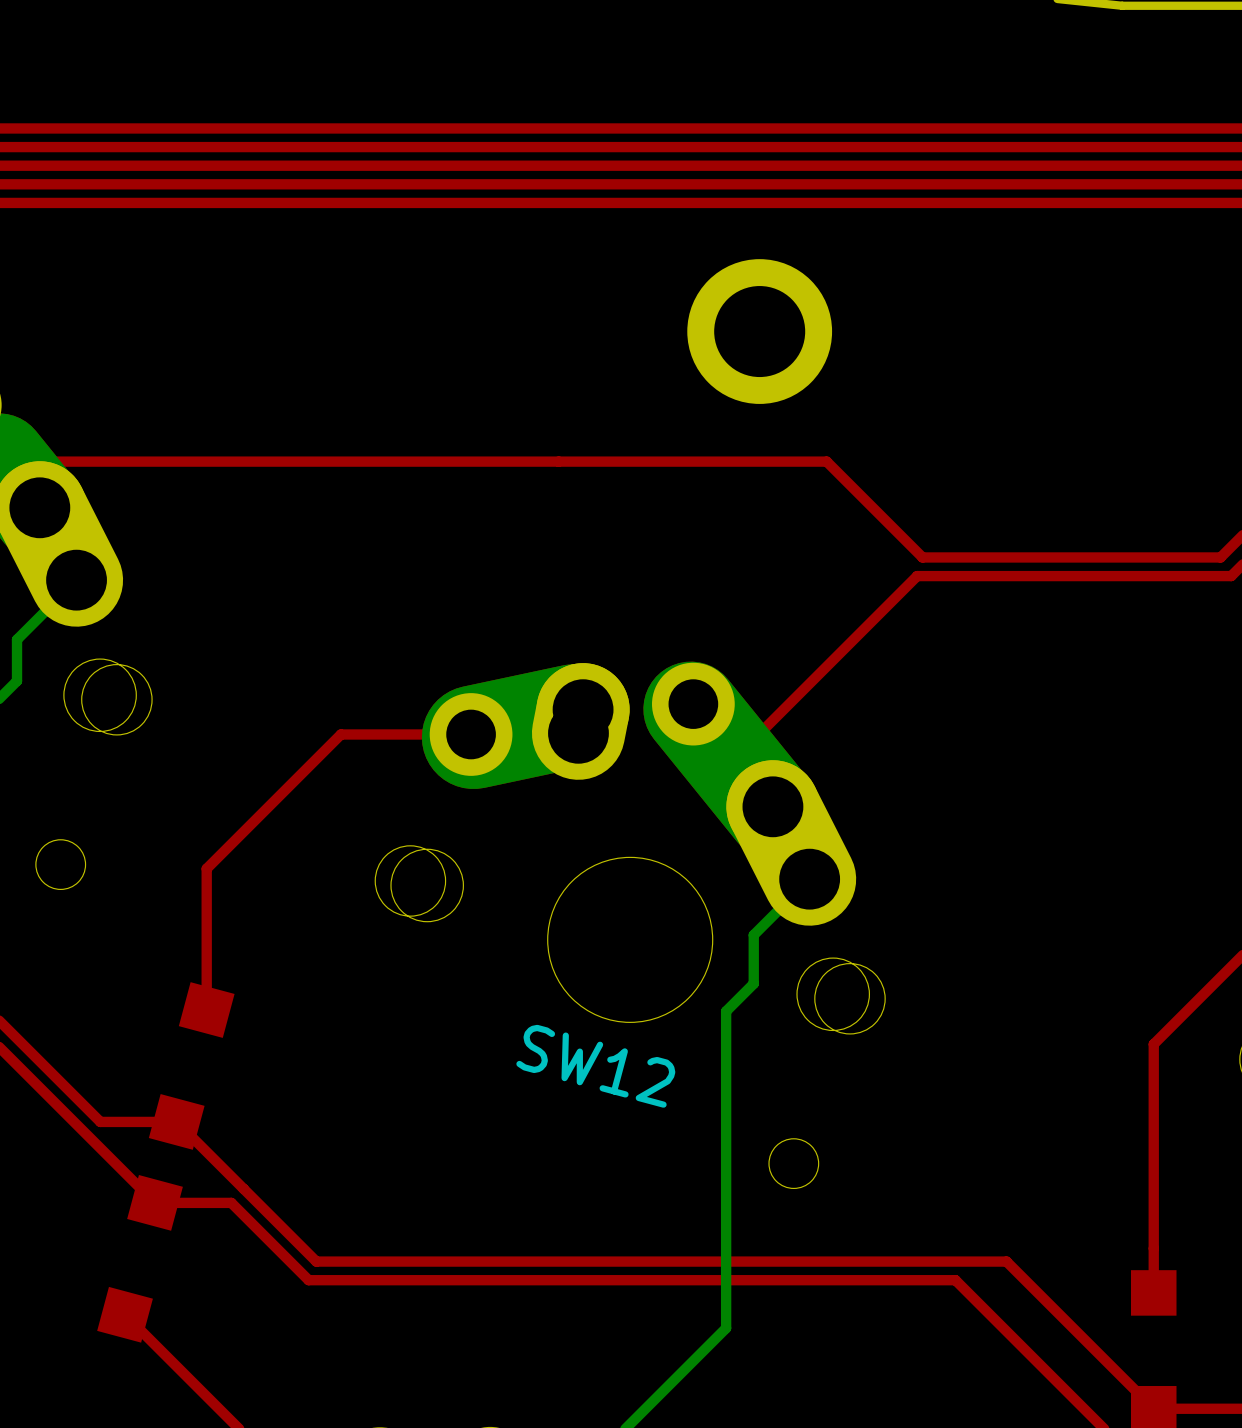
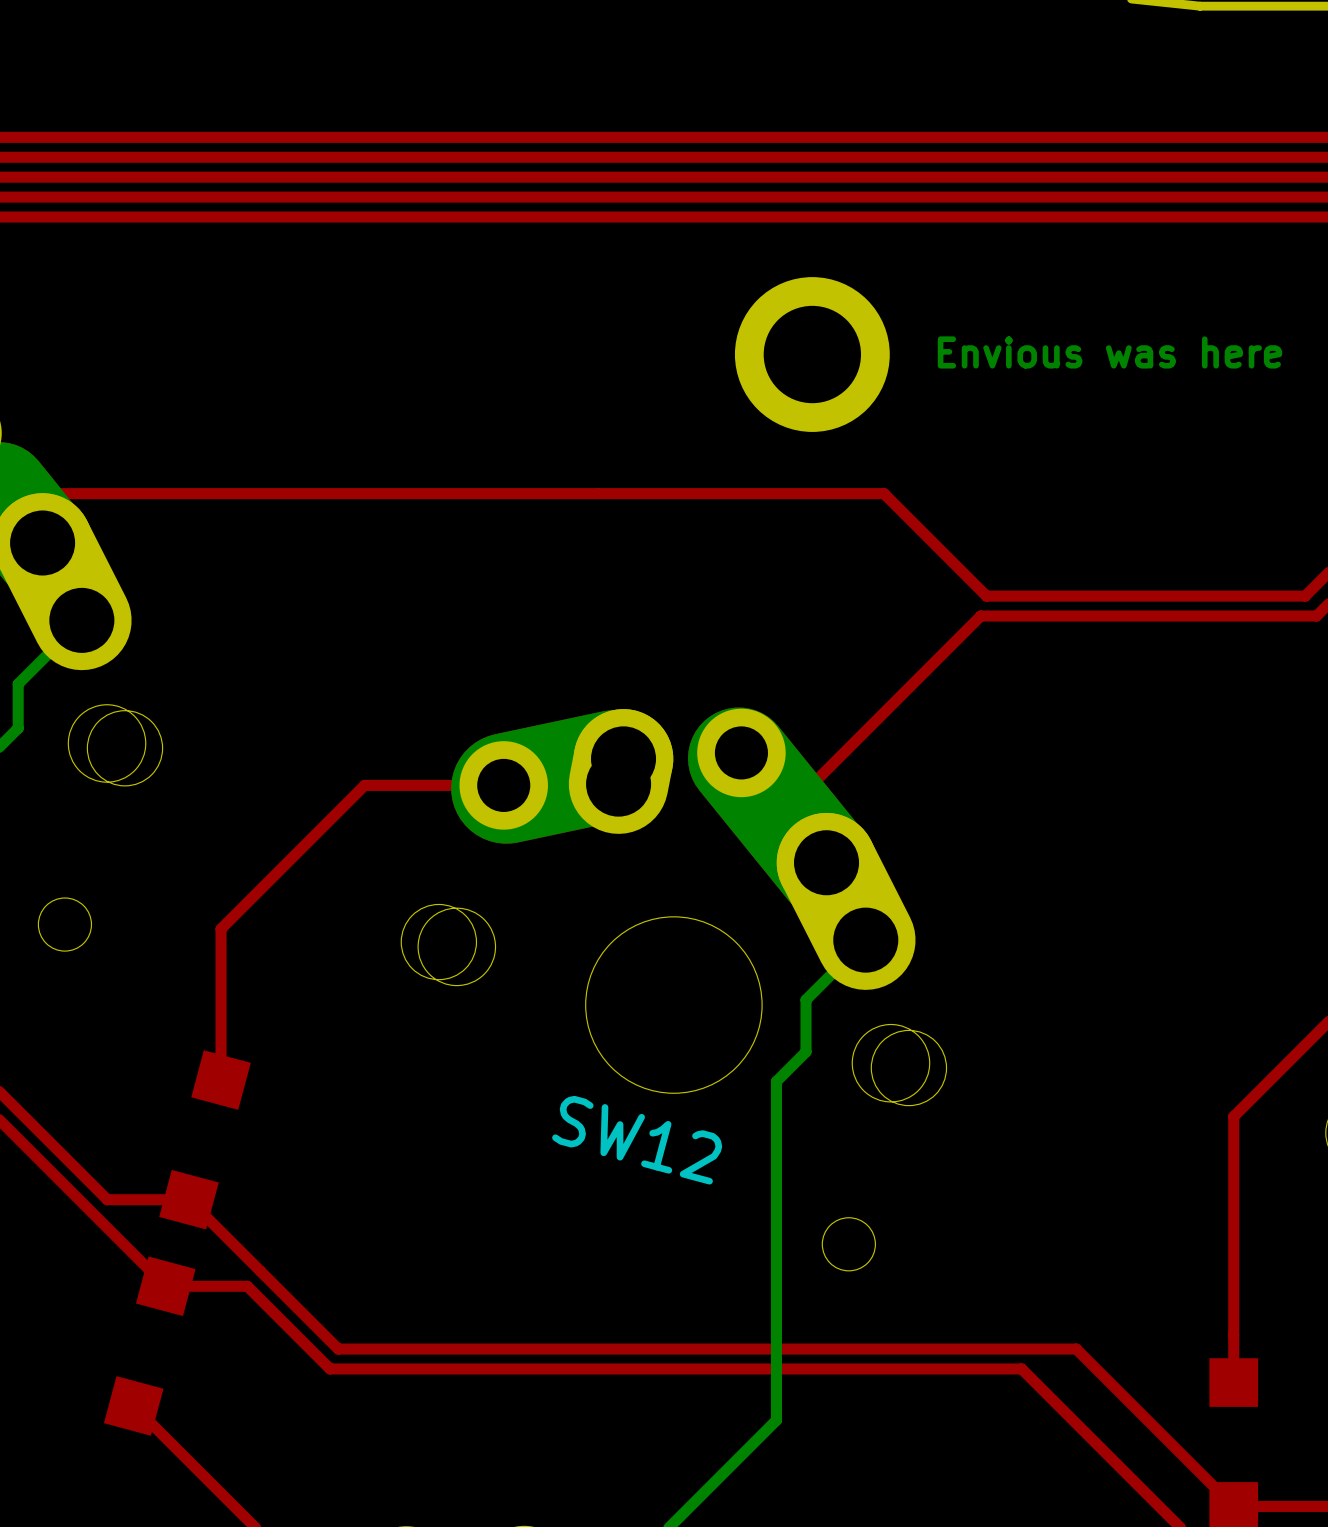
text: none -> Envious was here (1109, 352)

